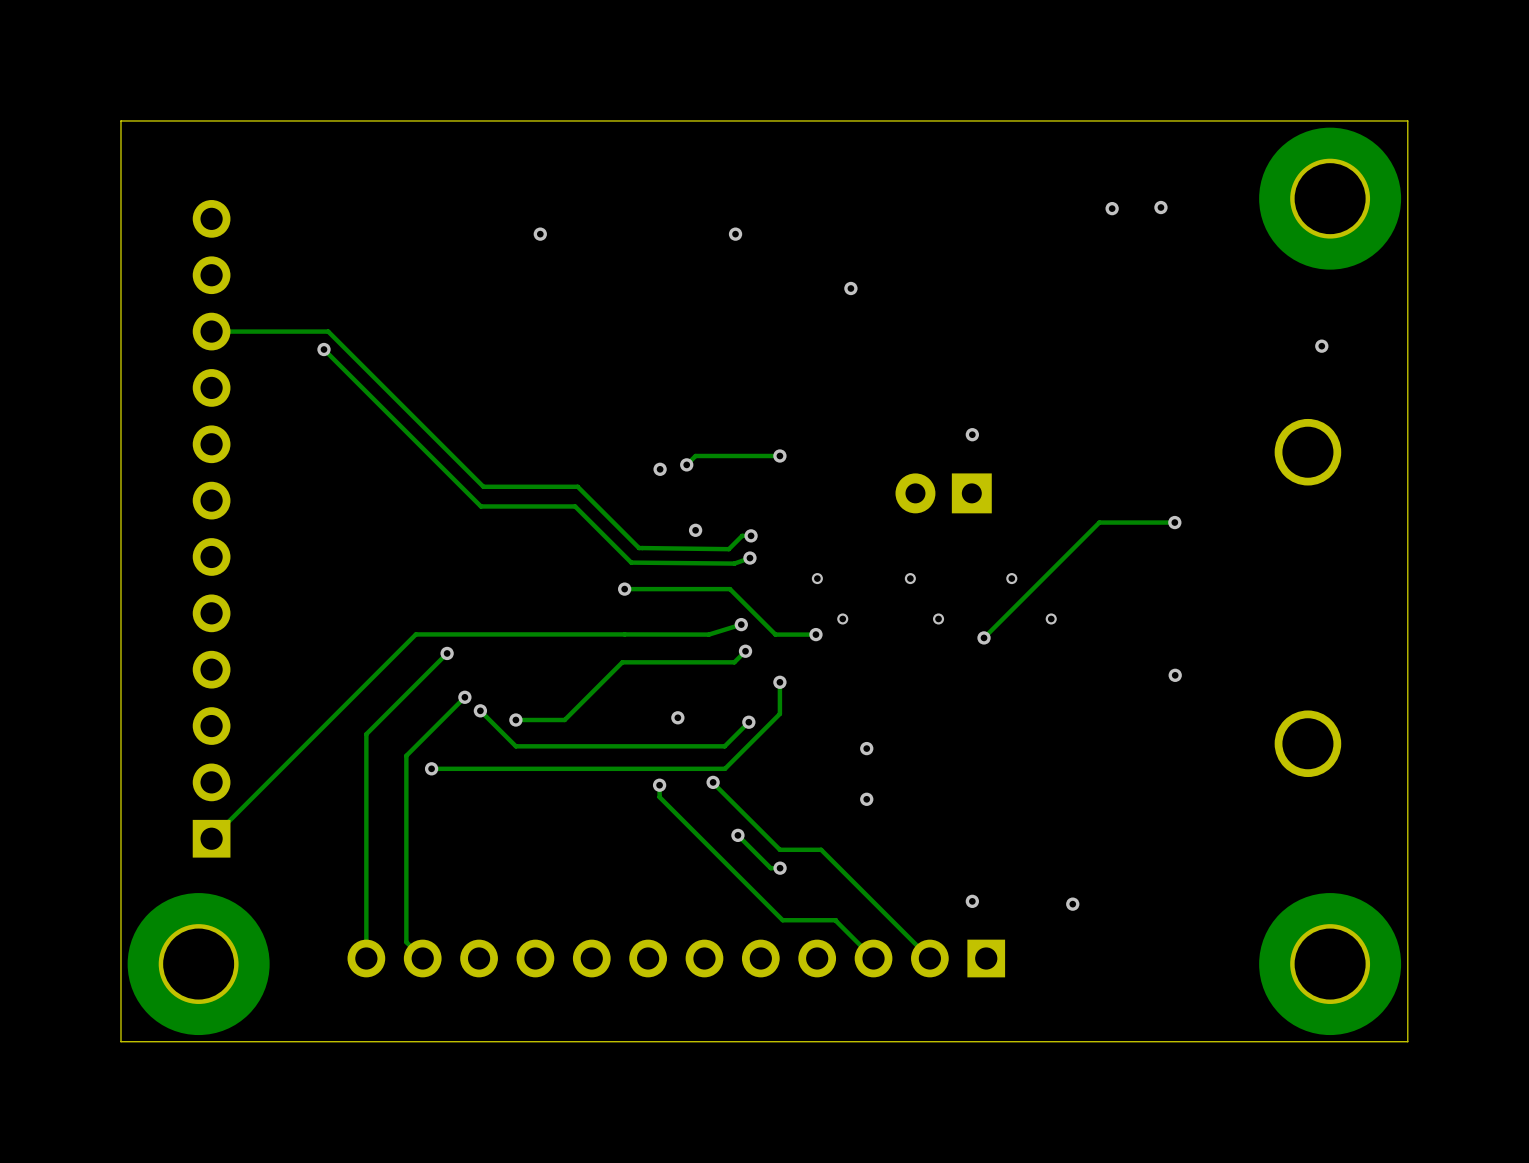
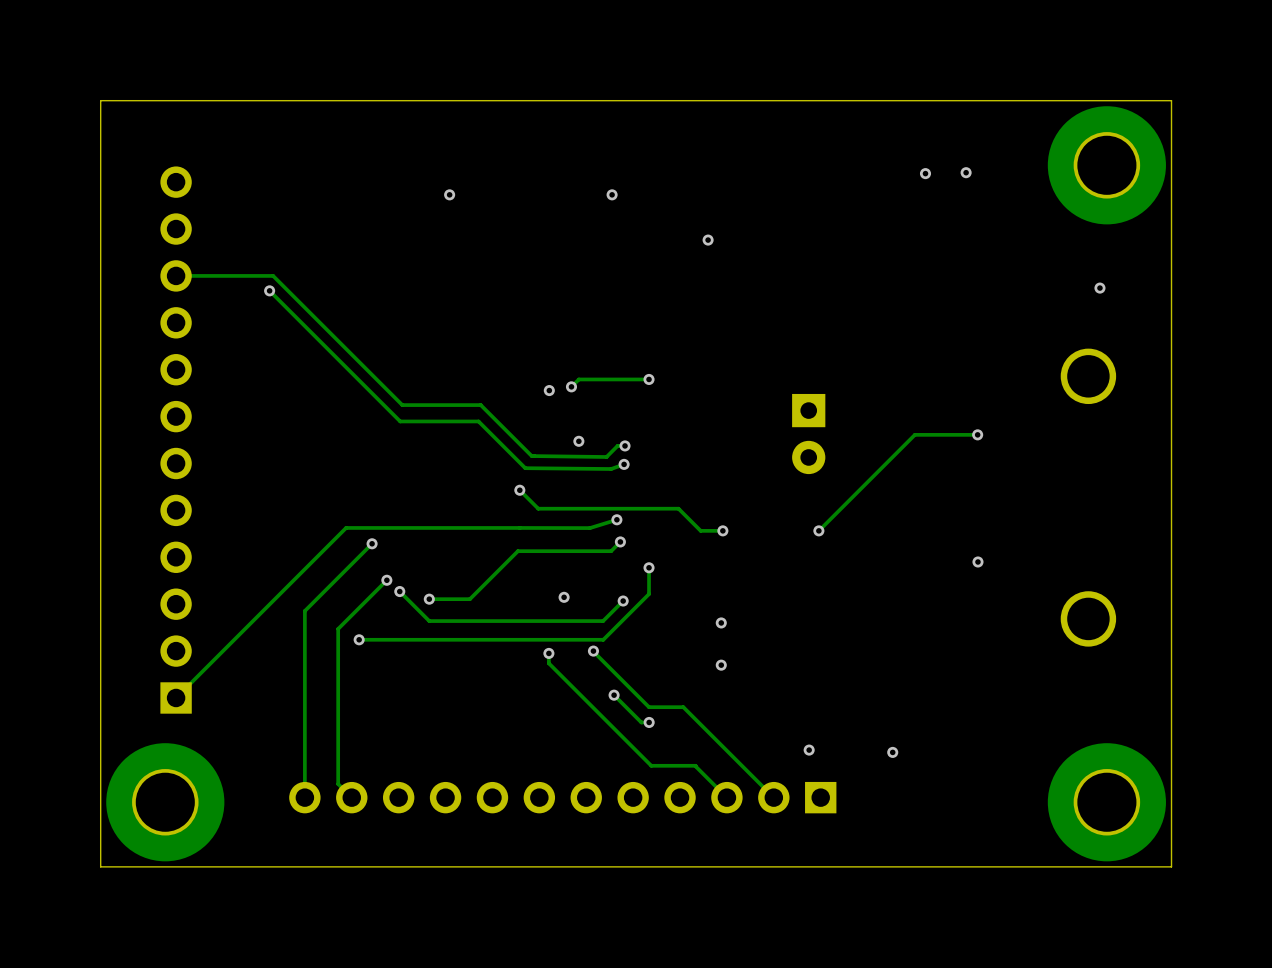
via: (972, 434) -> none
part rotation: 0° (943, 493) -> 90° counterclockwise (808, 434)
via: (817, 578) -> none
via: (910, 578) -> none
via: (1011, 578) -> none
track: (624, 589) (729, 589) (775, 634) (815, 634) -> (519, 490) (538, 508) (678, 508) (700, 530) (722, 530)
via: (842, 618) -> none
via: (938, 618) -> none
via: (1051, 618) -> none
via position: (815, 634) -> (722, 530)

